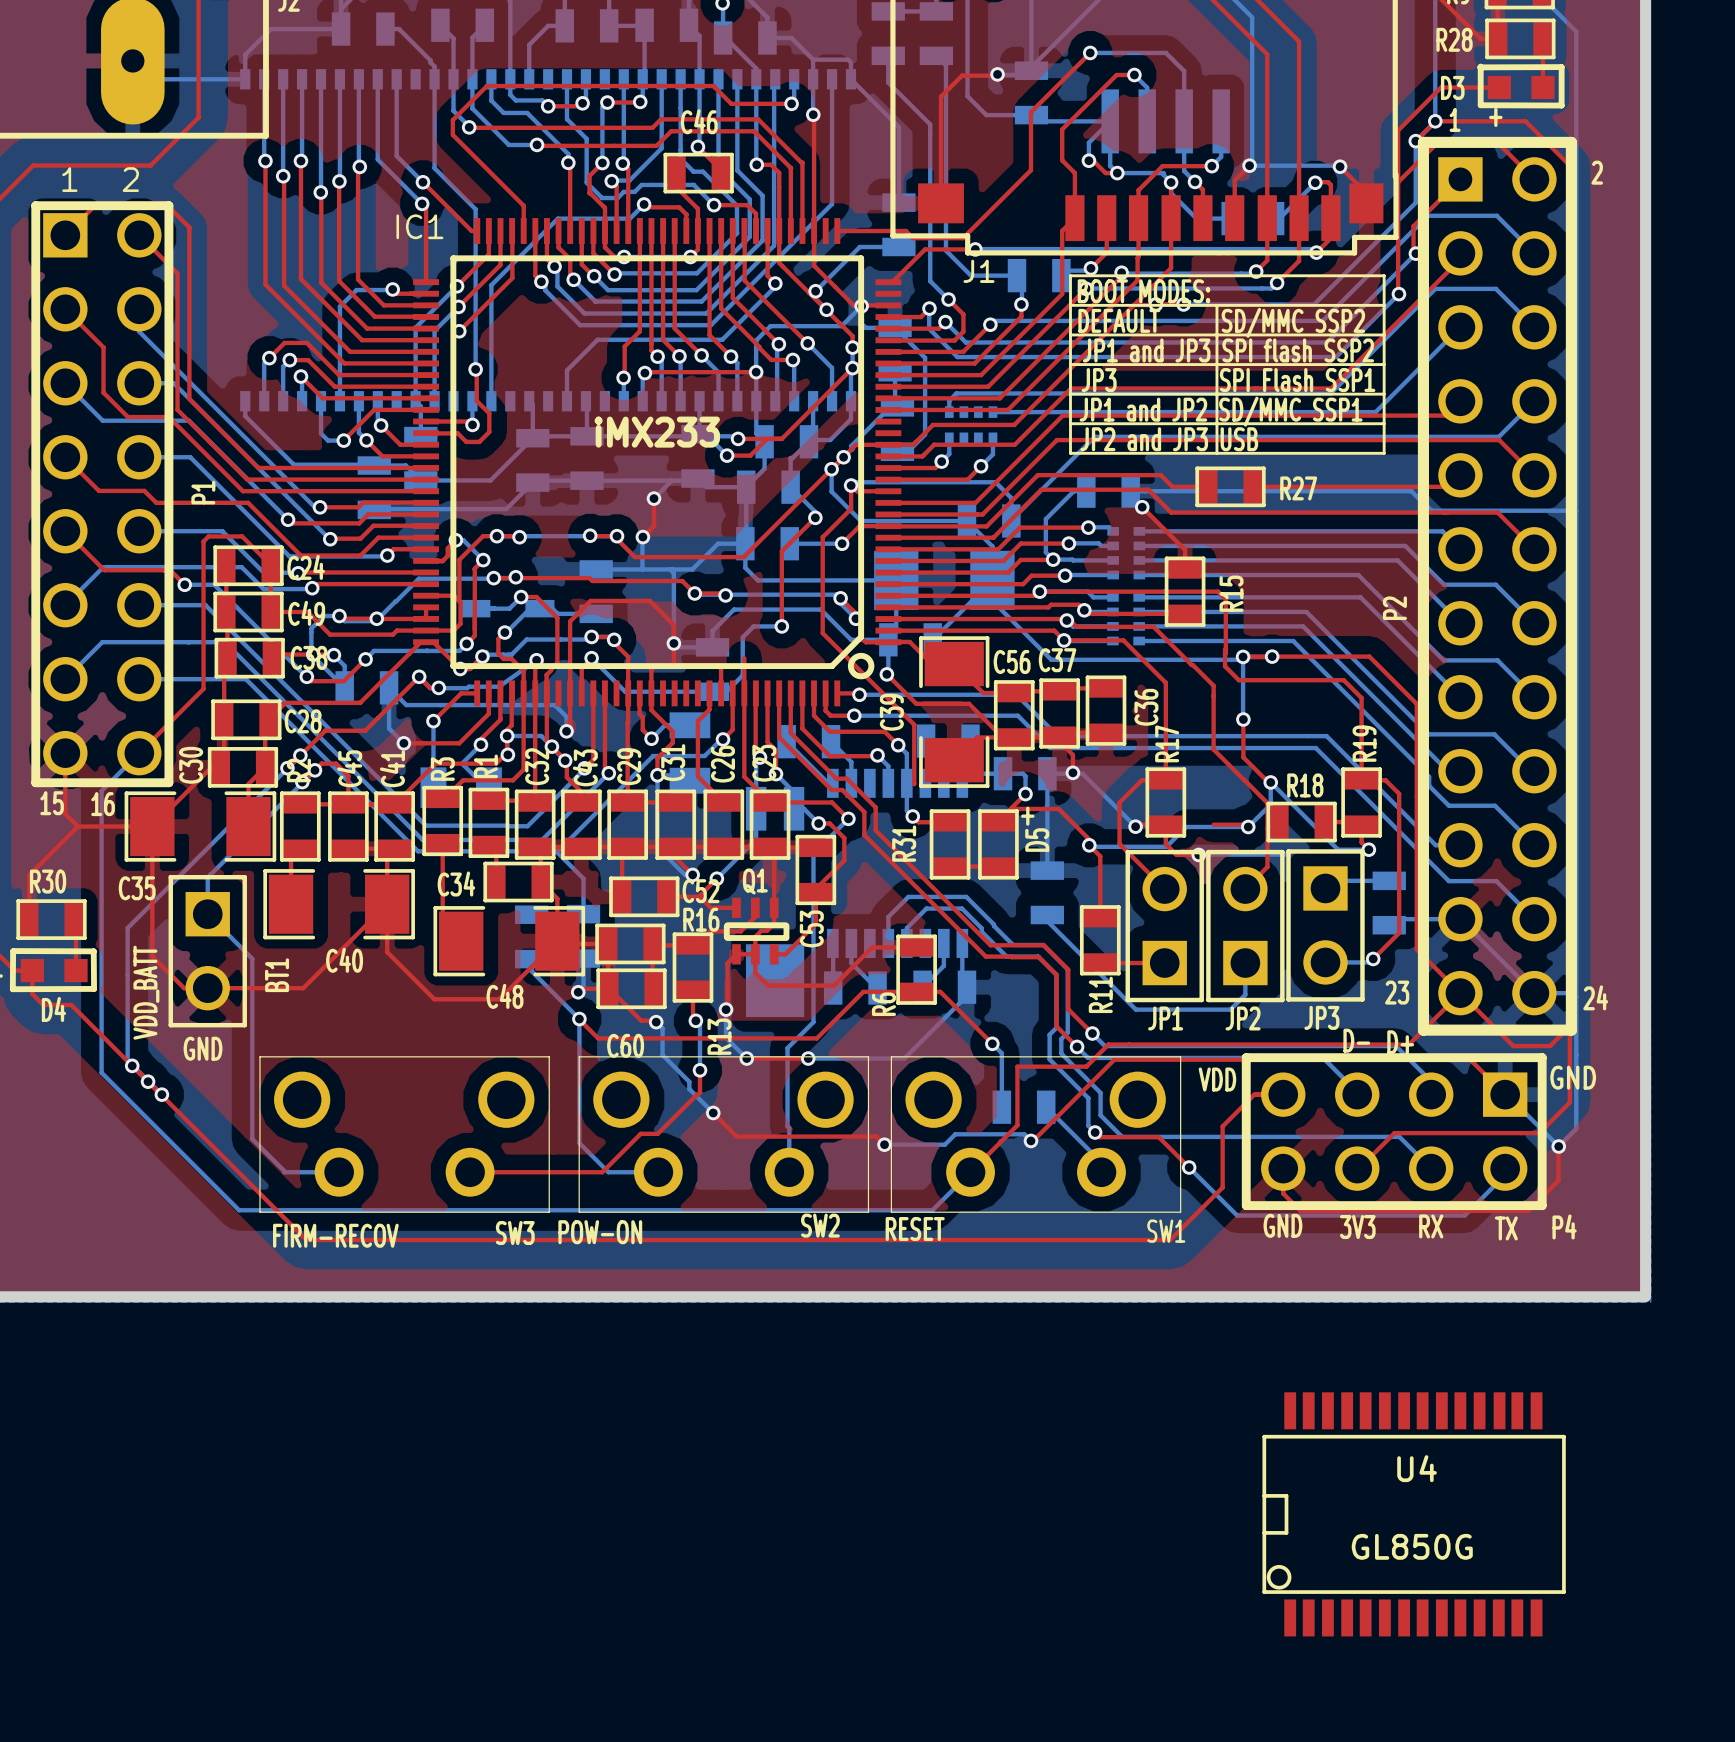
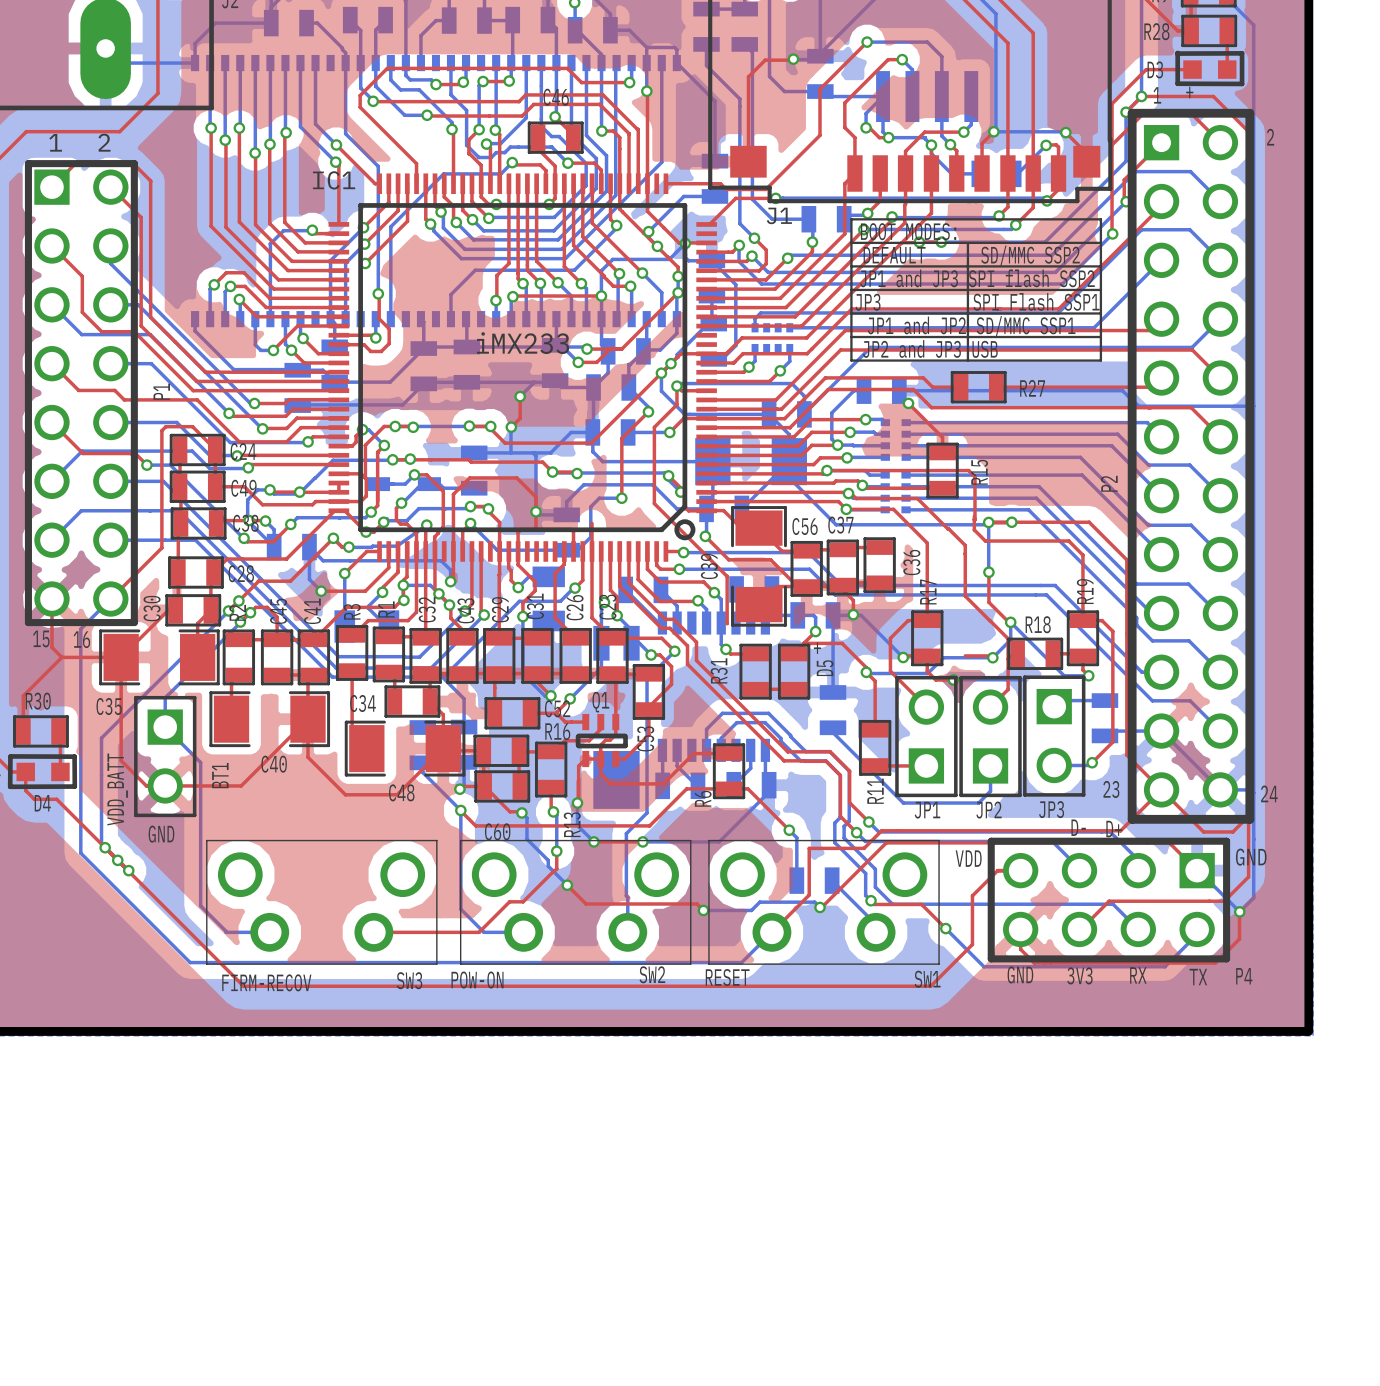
U4: GL850G (1414, 1514) -> none

